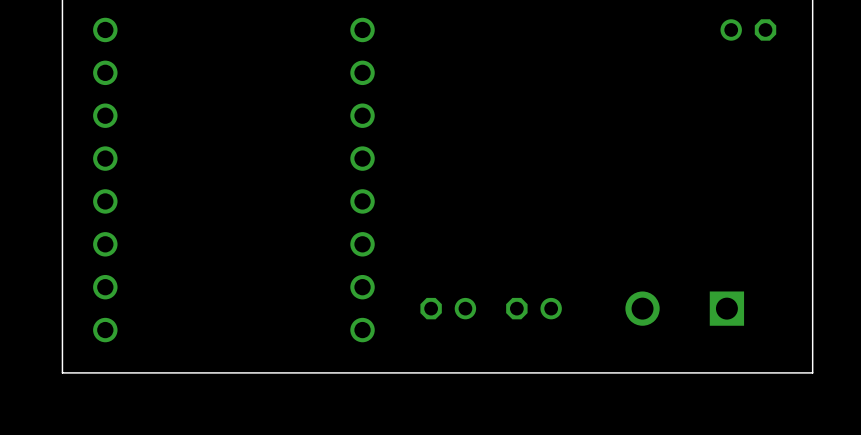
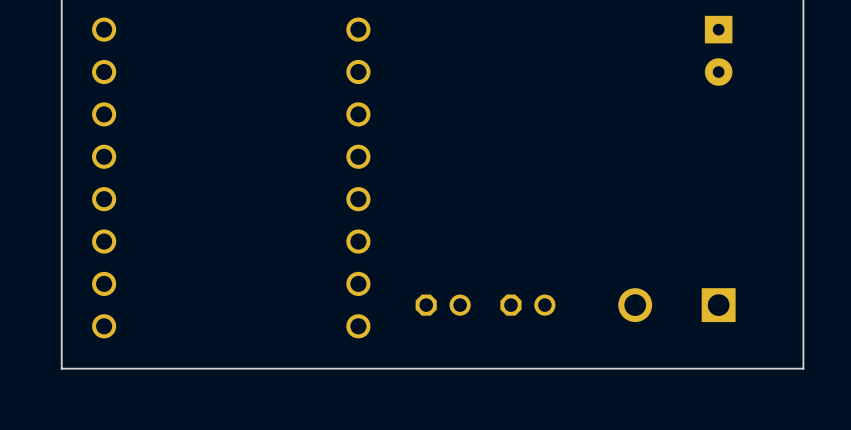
part: (748, 29) -> none
part: none -> (718, 50)

